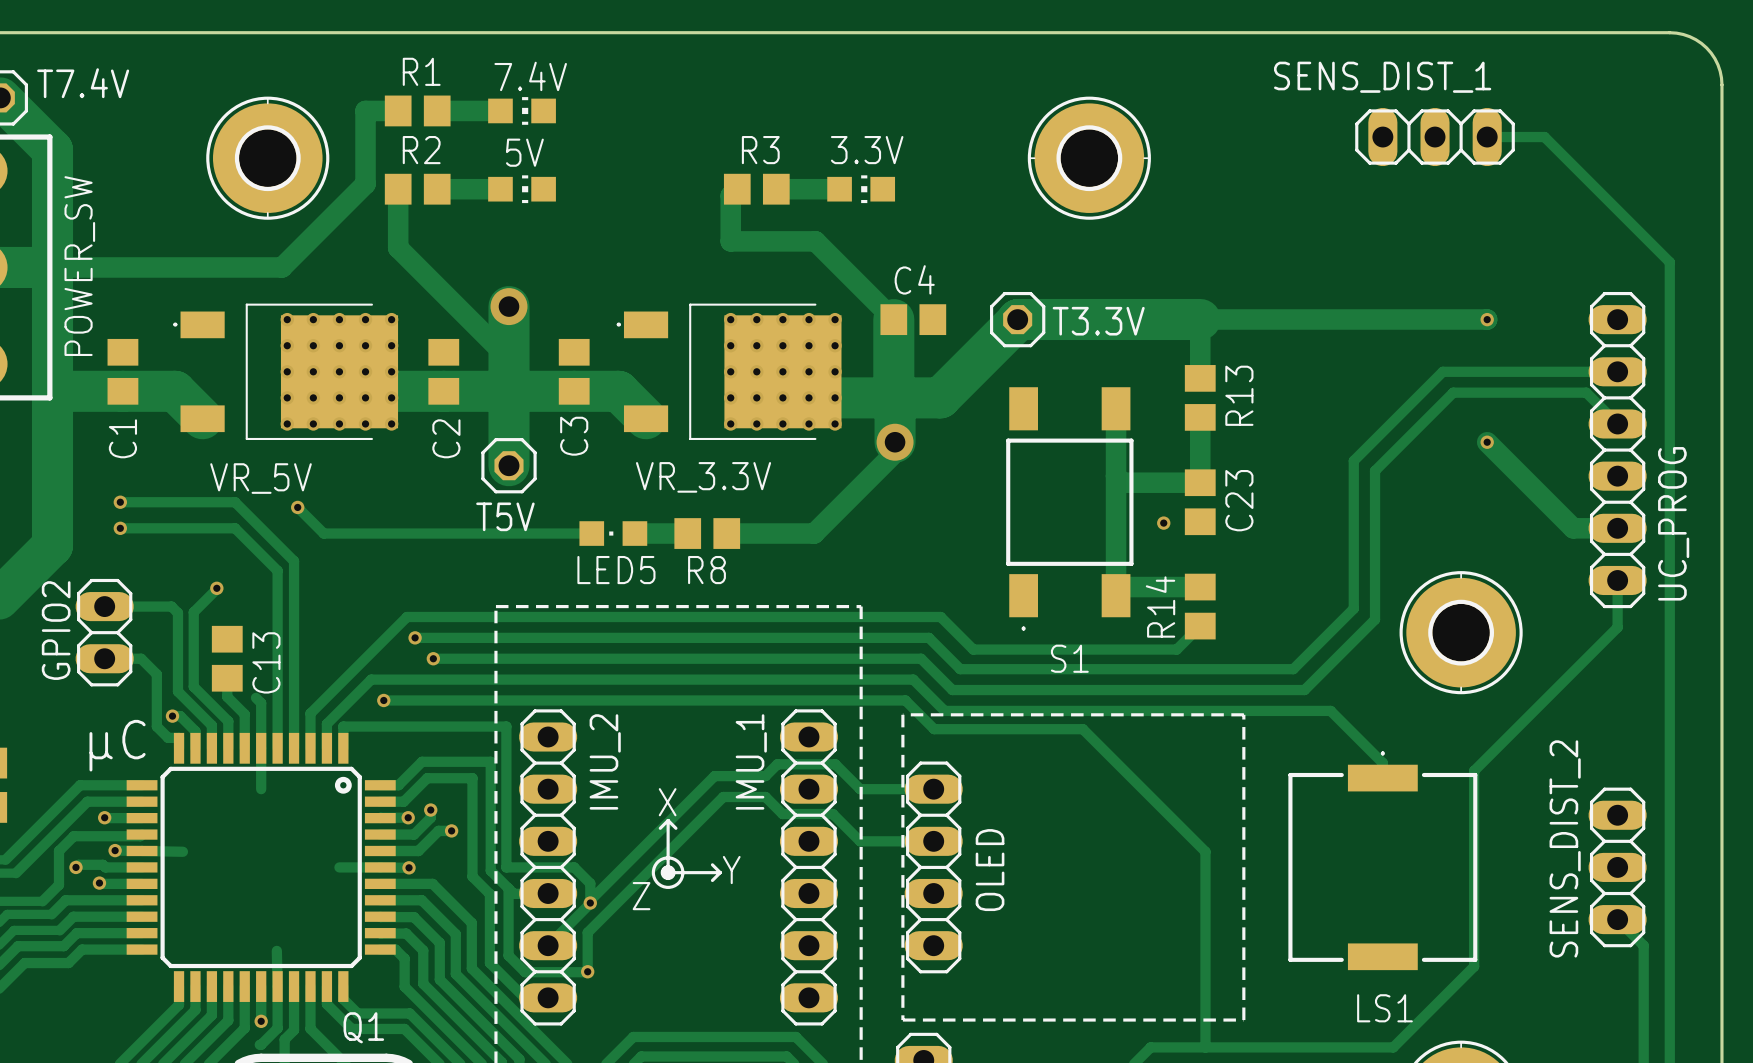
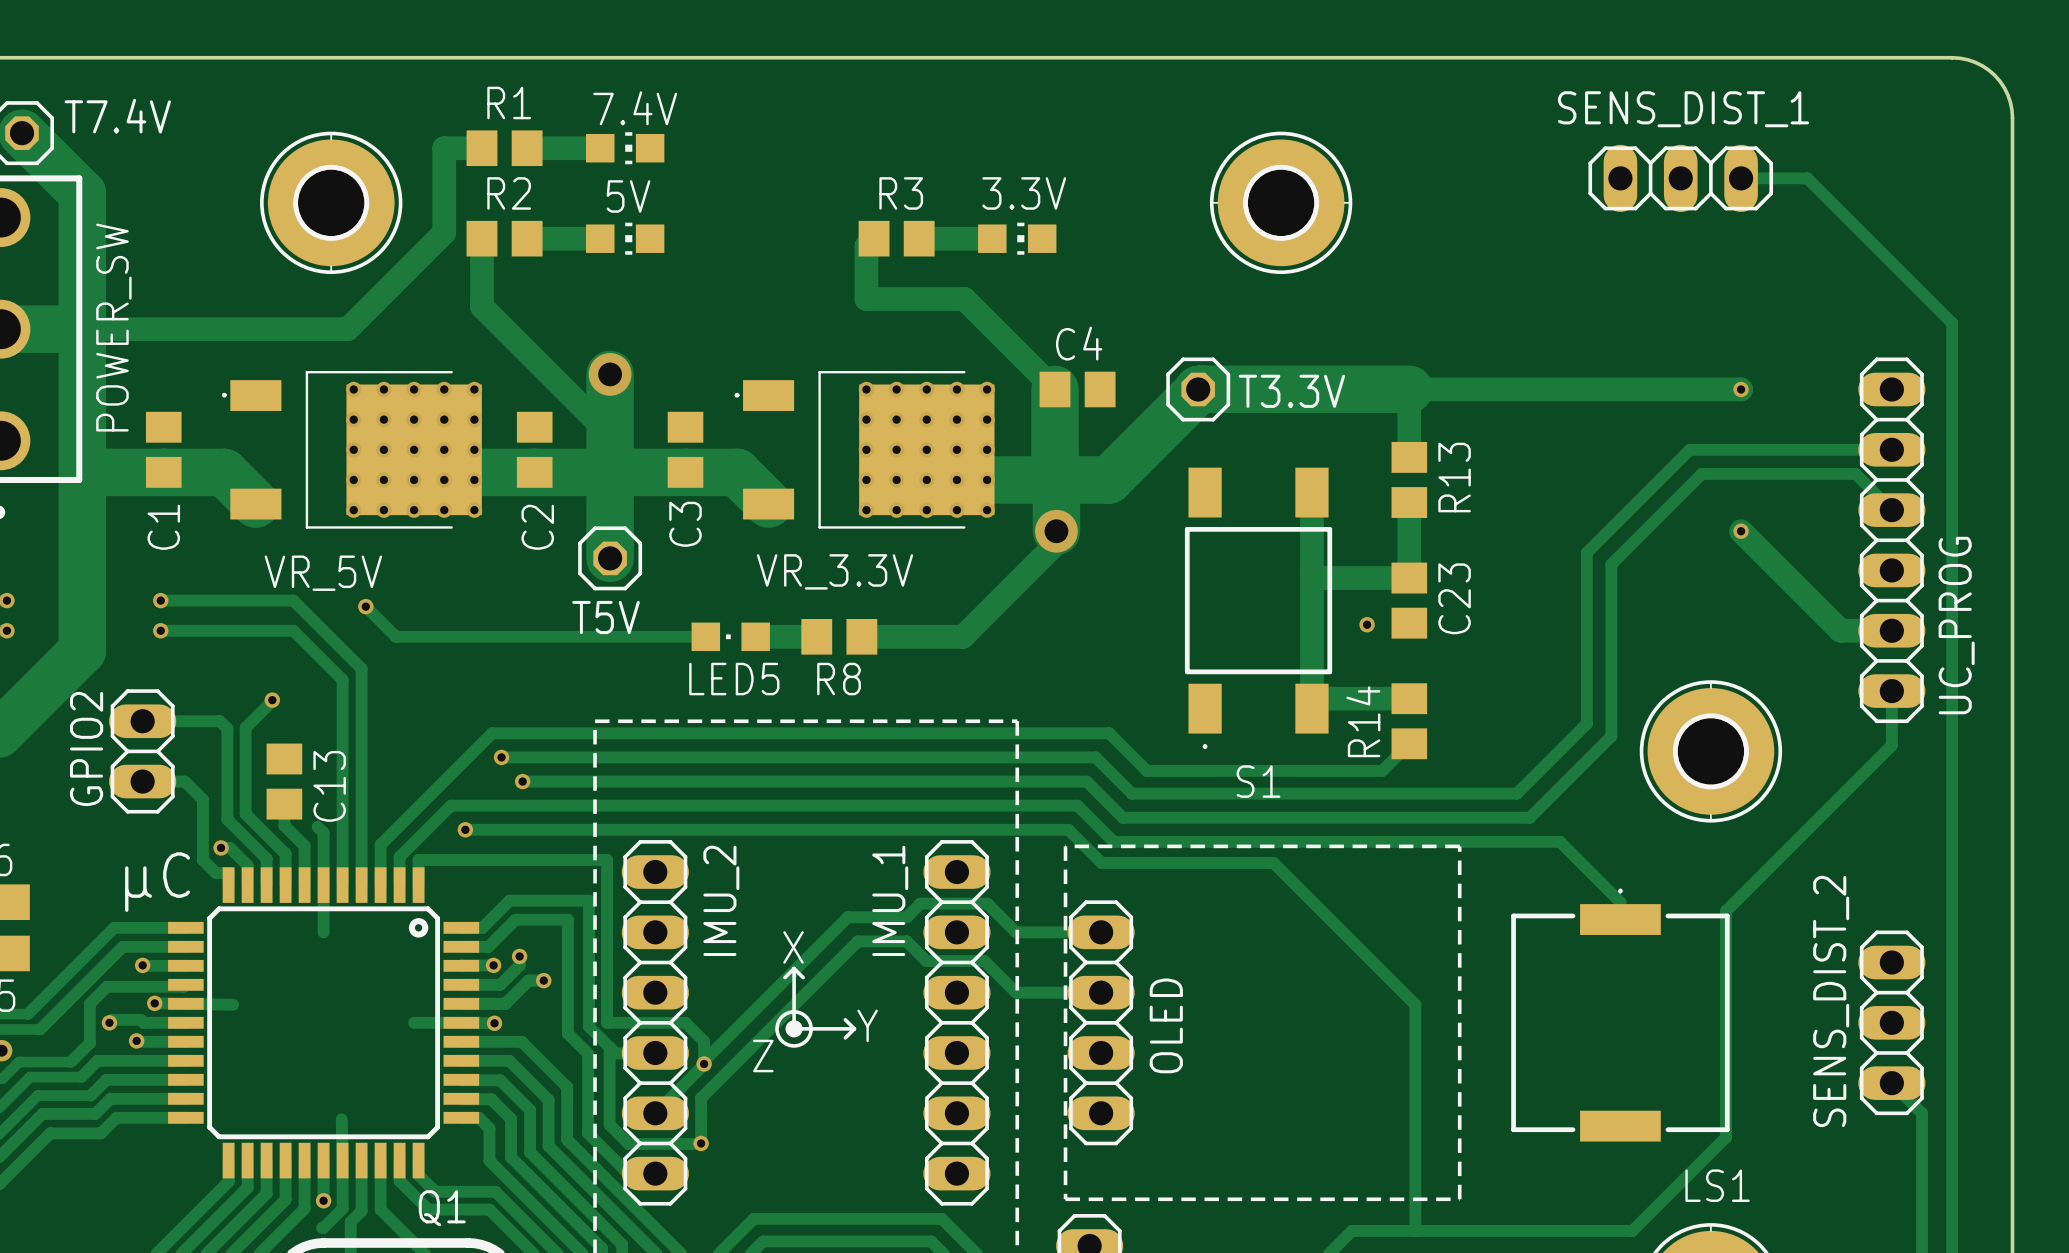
SENS_DIST_1 name position: SENS_DIST_1 (1382, 77) -> SENS_DIST_1 (1683, 109)
LS1 name position: LS1 (1384, 1008) -> LS1 (1717, 1185)

